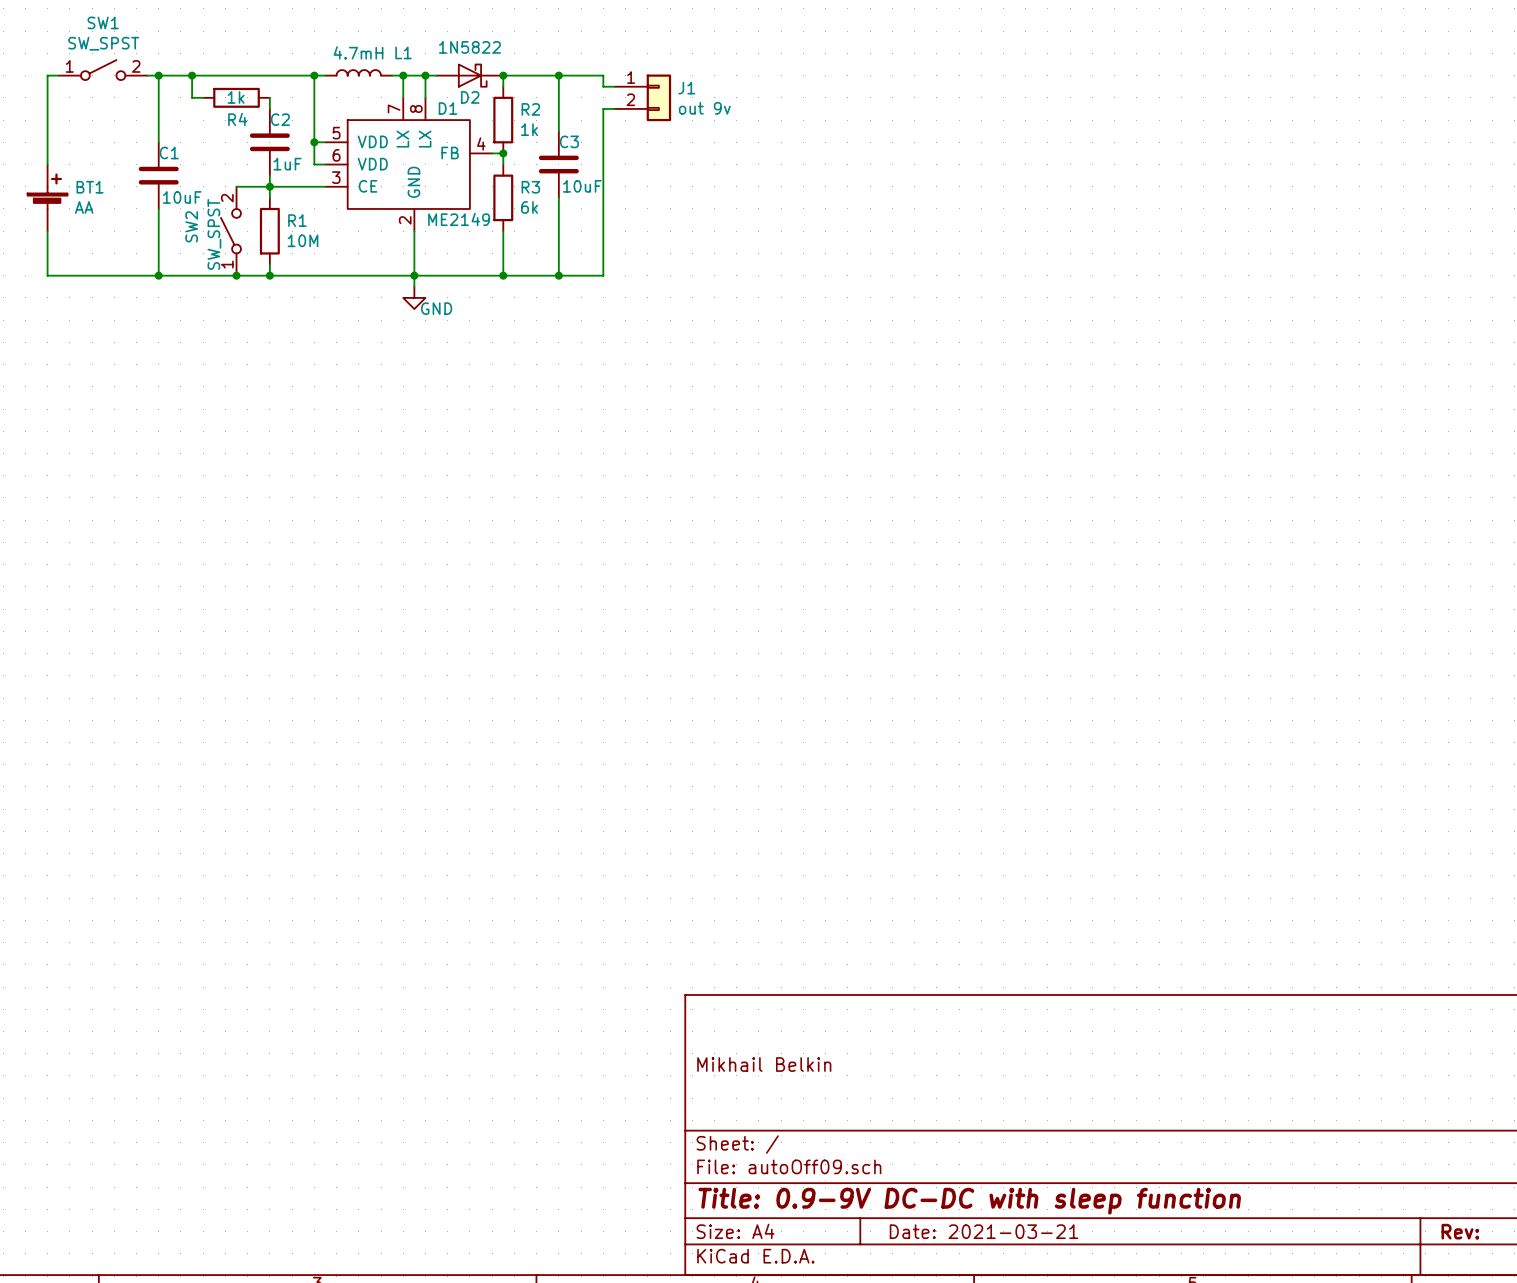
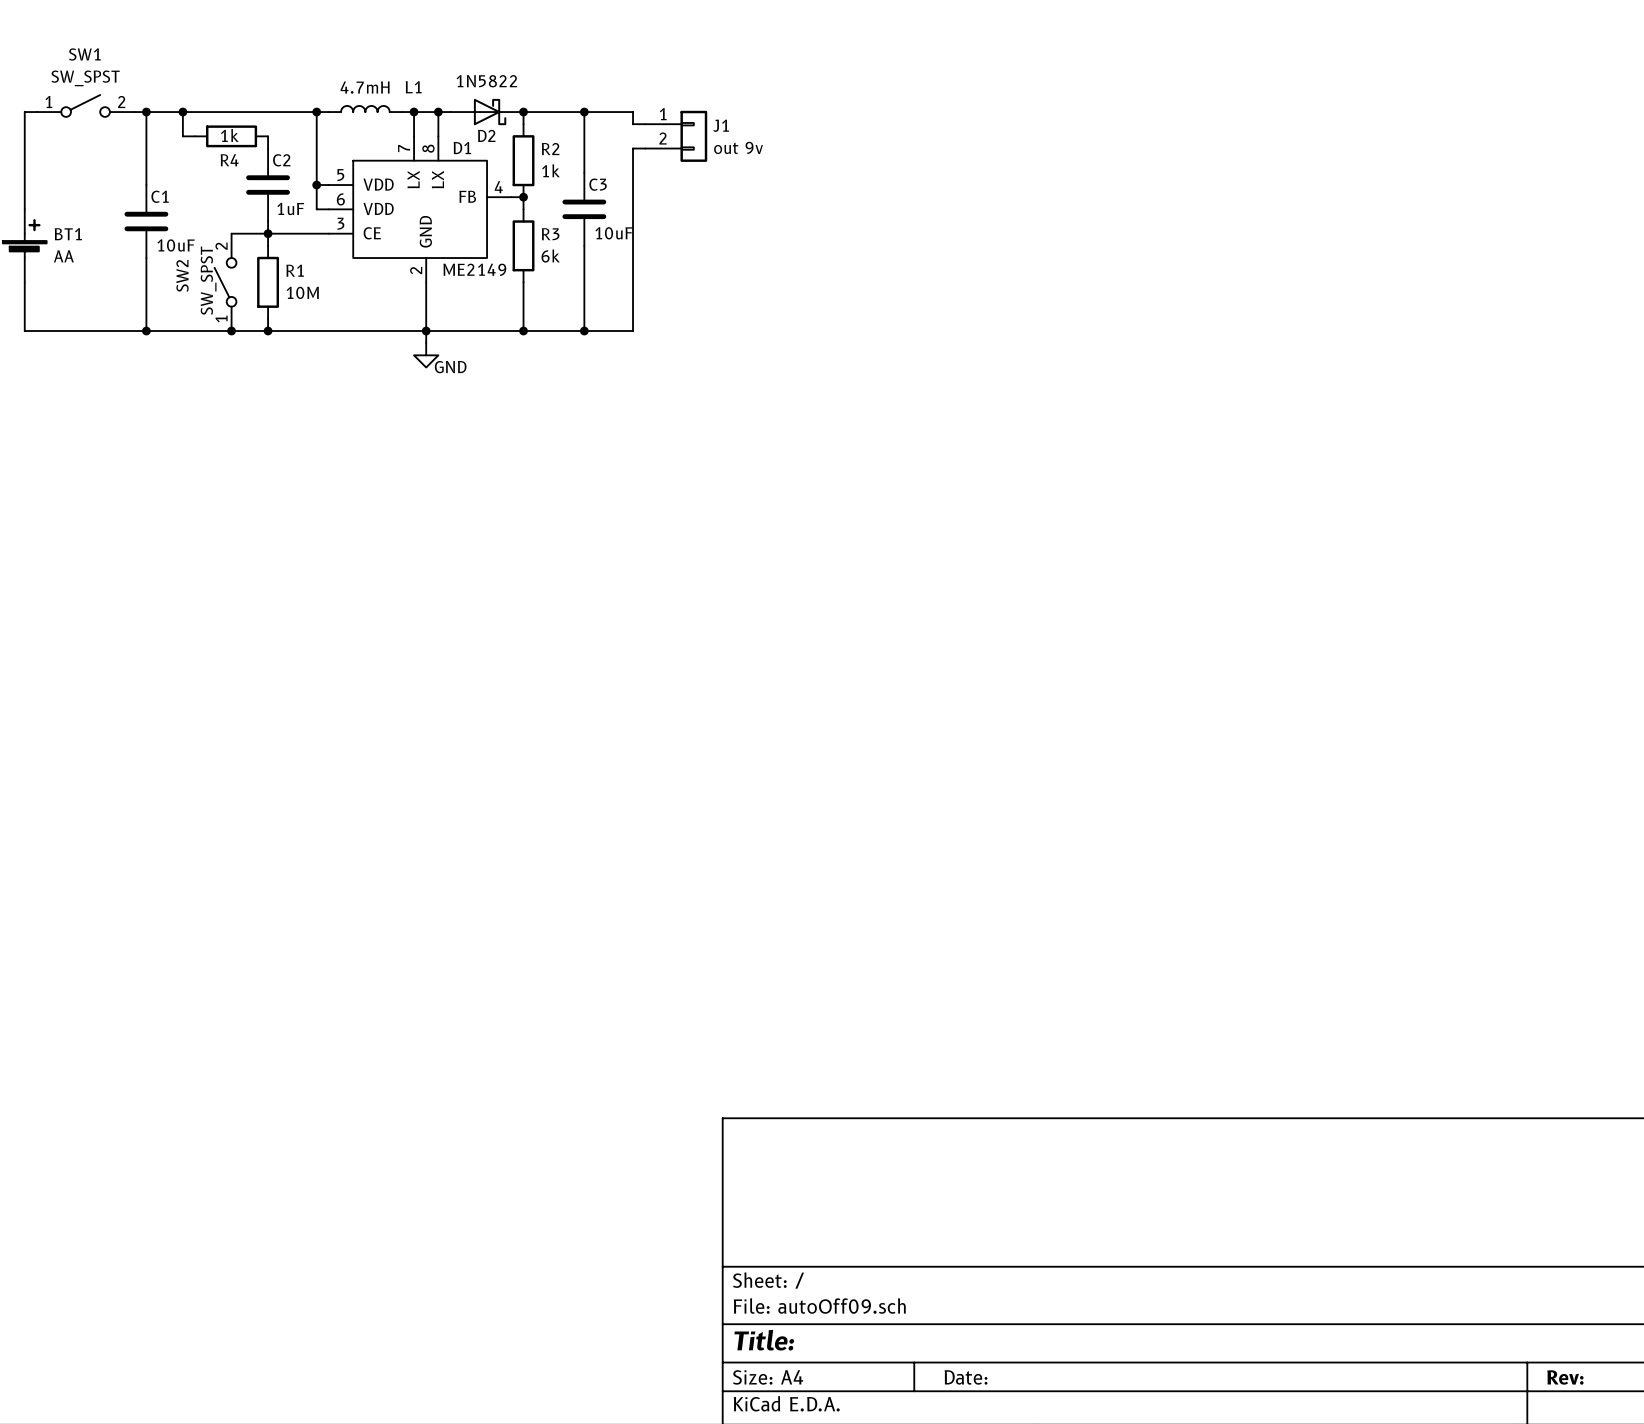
title block: Mikhail Belkin (764, 1064) -> none
title block: Title: 0.9-9V DC-DC with sleep function (969, 1201) -> Title: (764, 1340)
title block: Date: 2021-03-21 (984, 1231) -> Date: (966, 1377)

